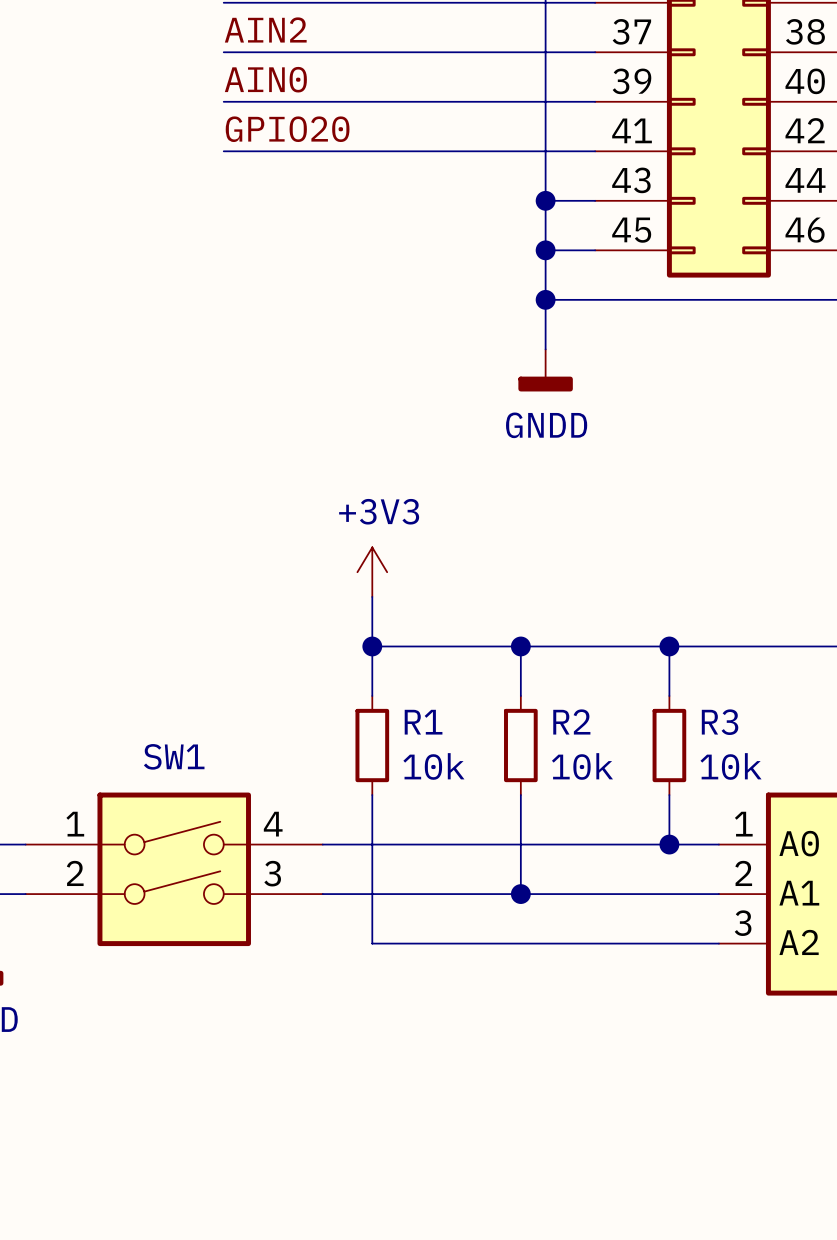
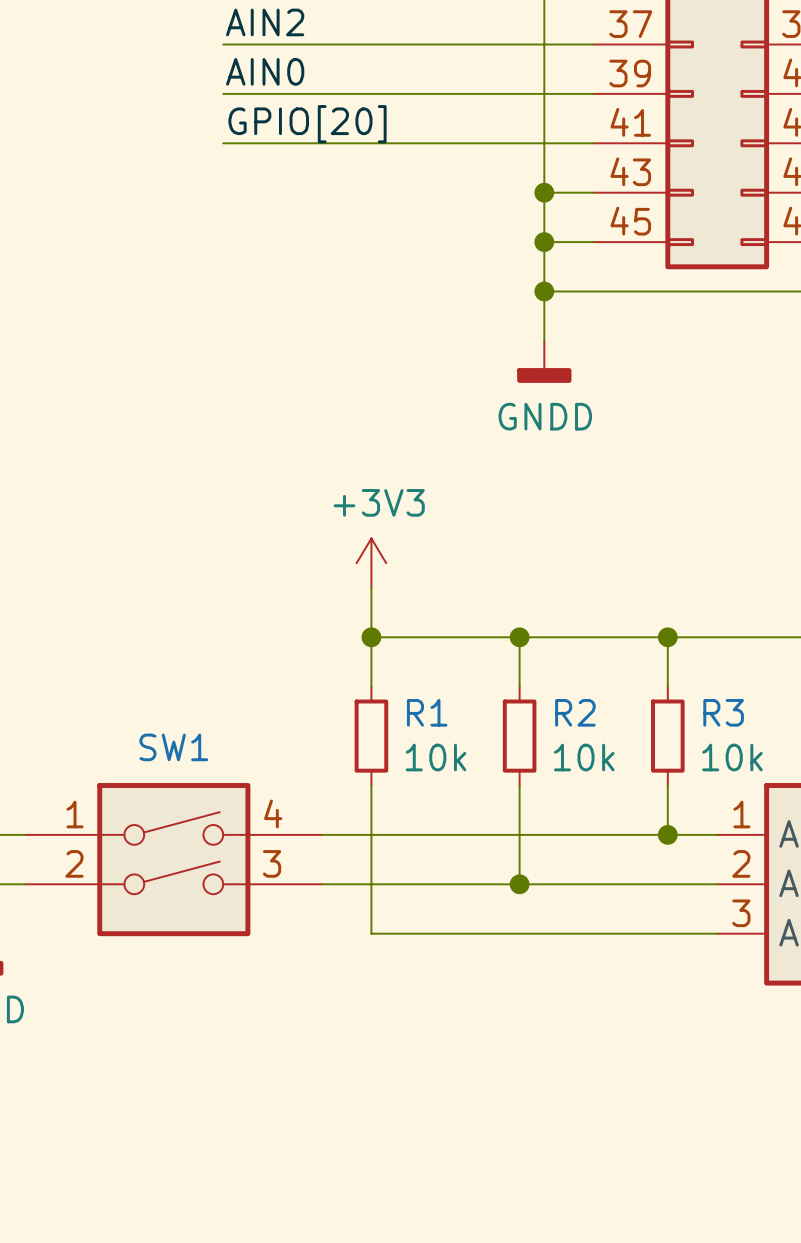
label: GPIO20 (287, 129) -> GPIO[20] (307, 124)

